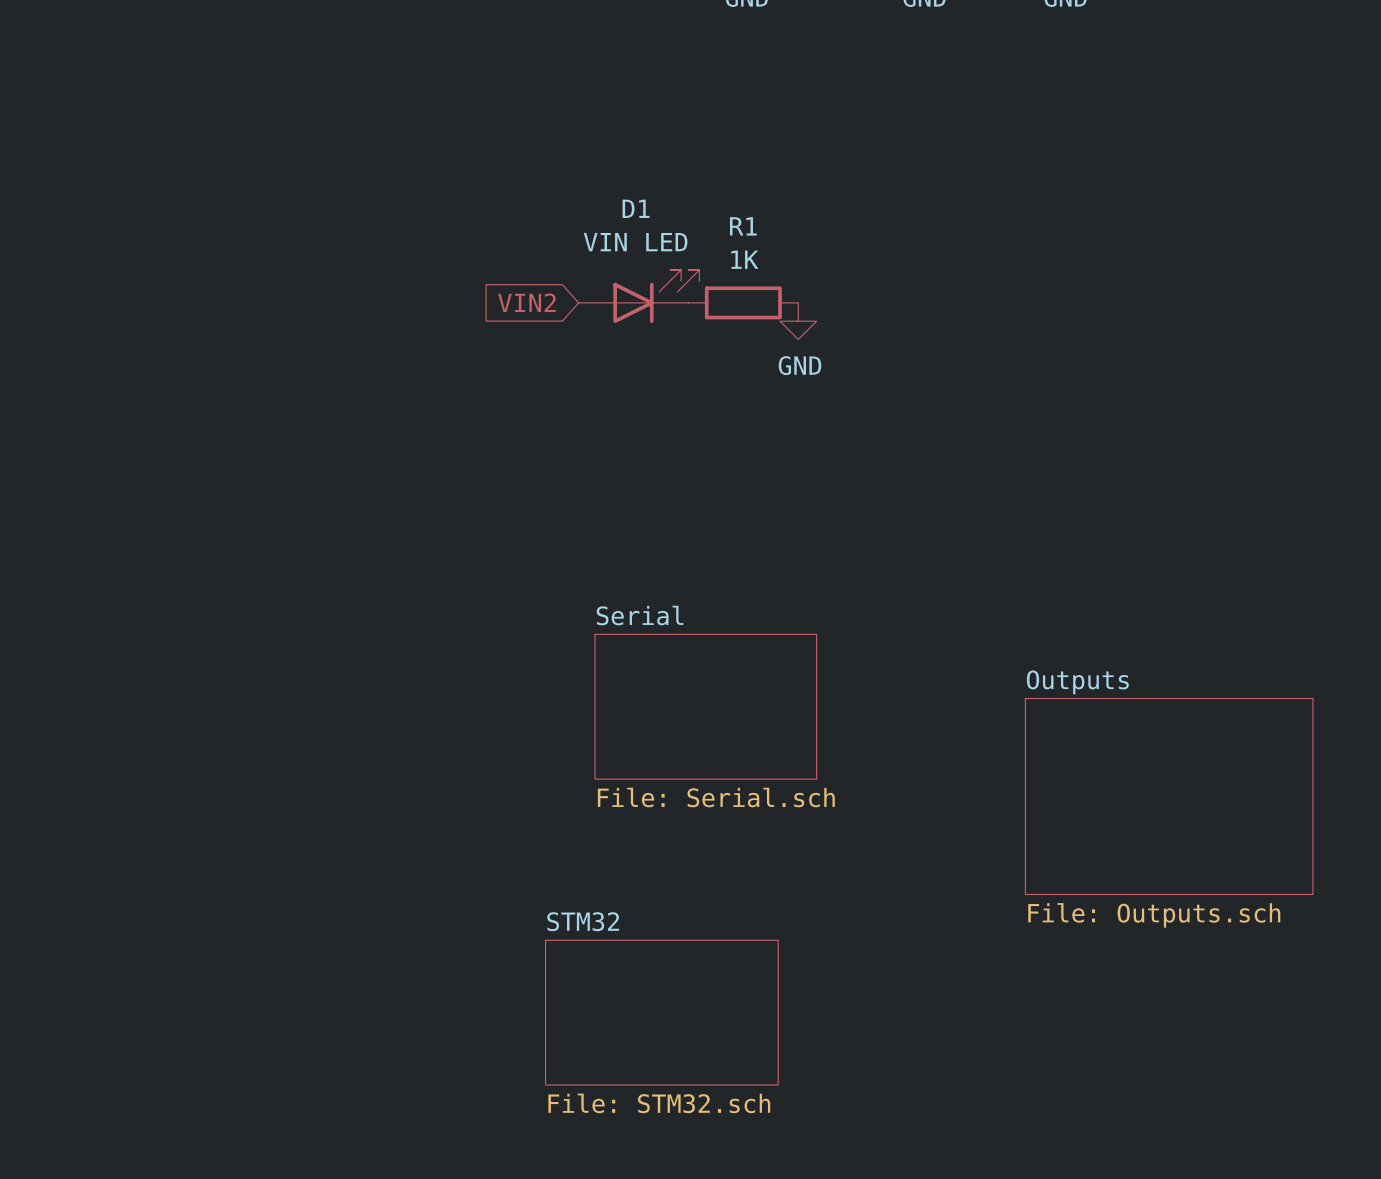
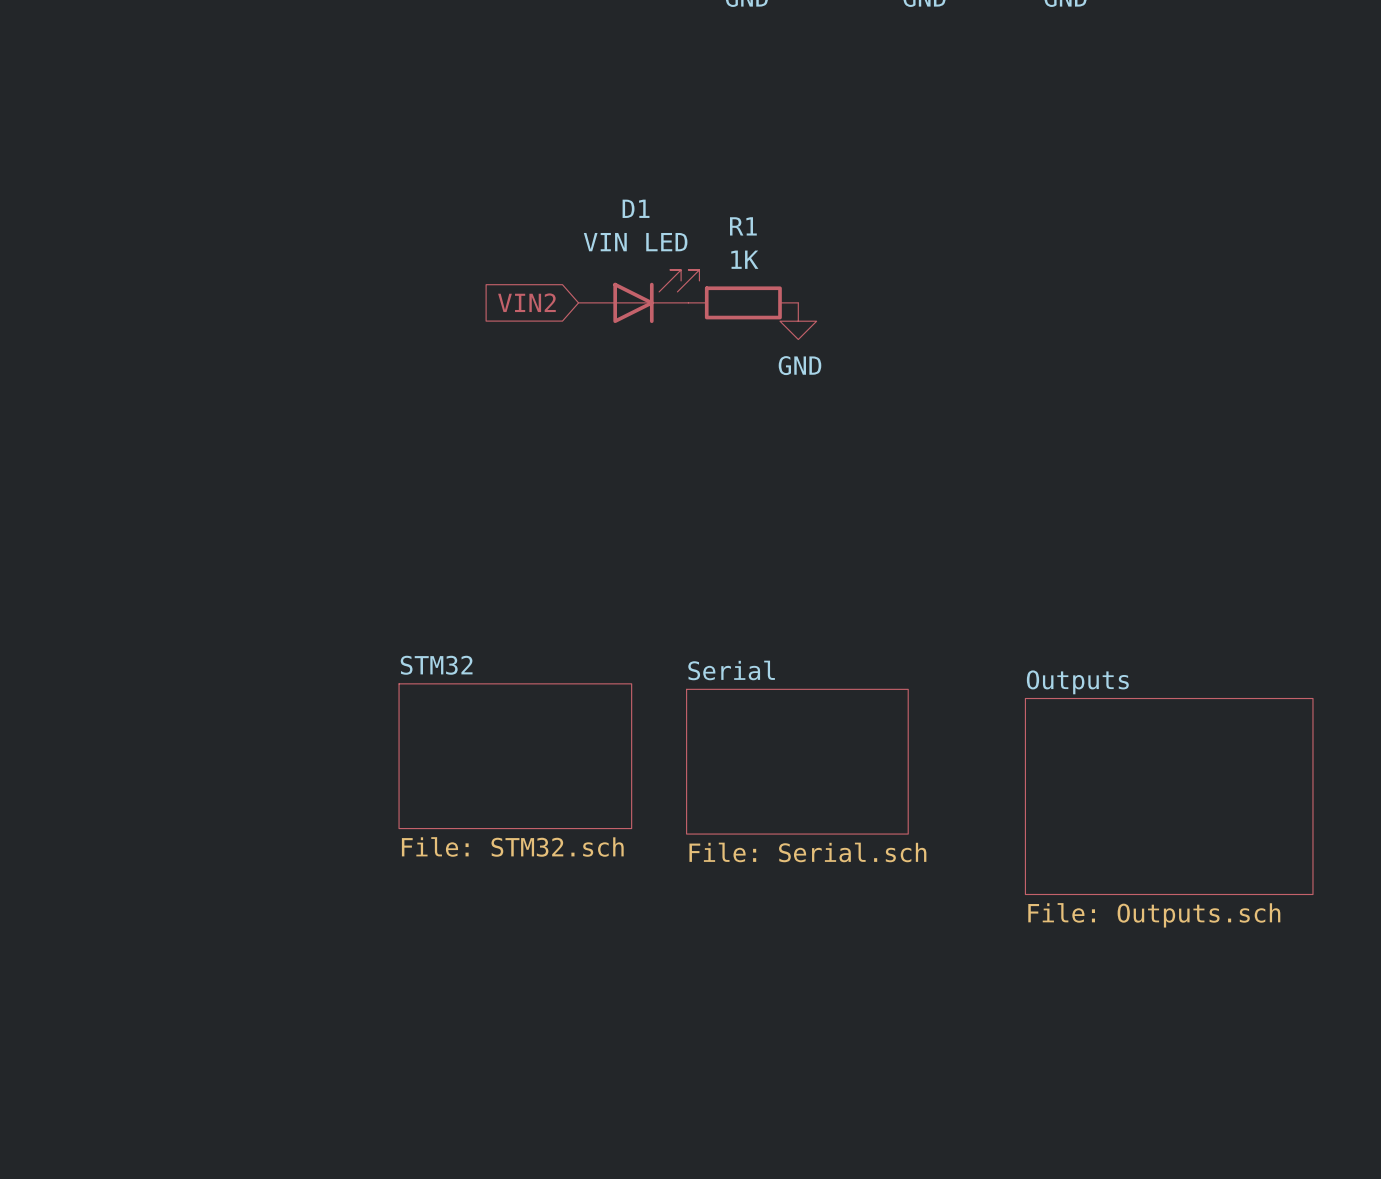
sheet Serial position: (705, 706) -> (797, 761)
sheet STM32 position: (661, 1012) -> (515, 756)

